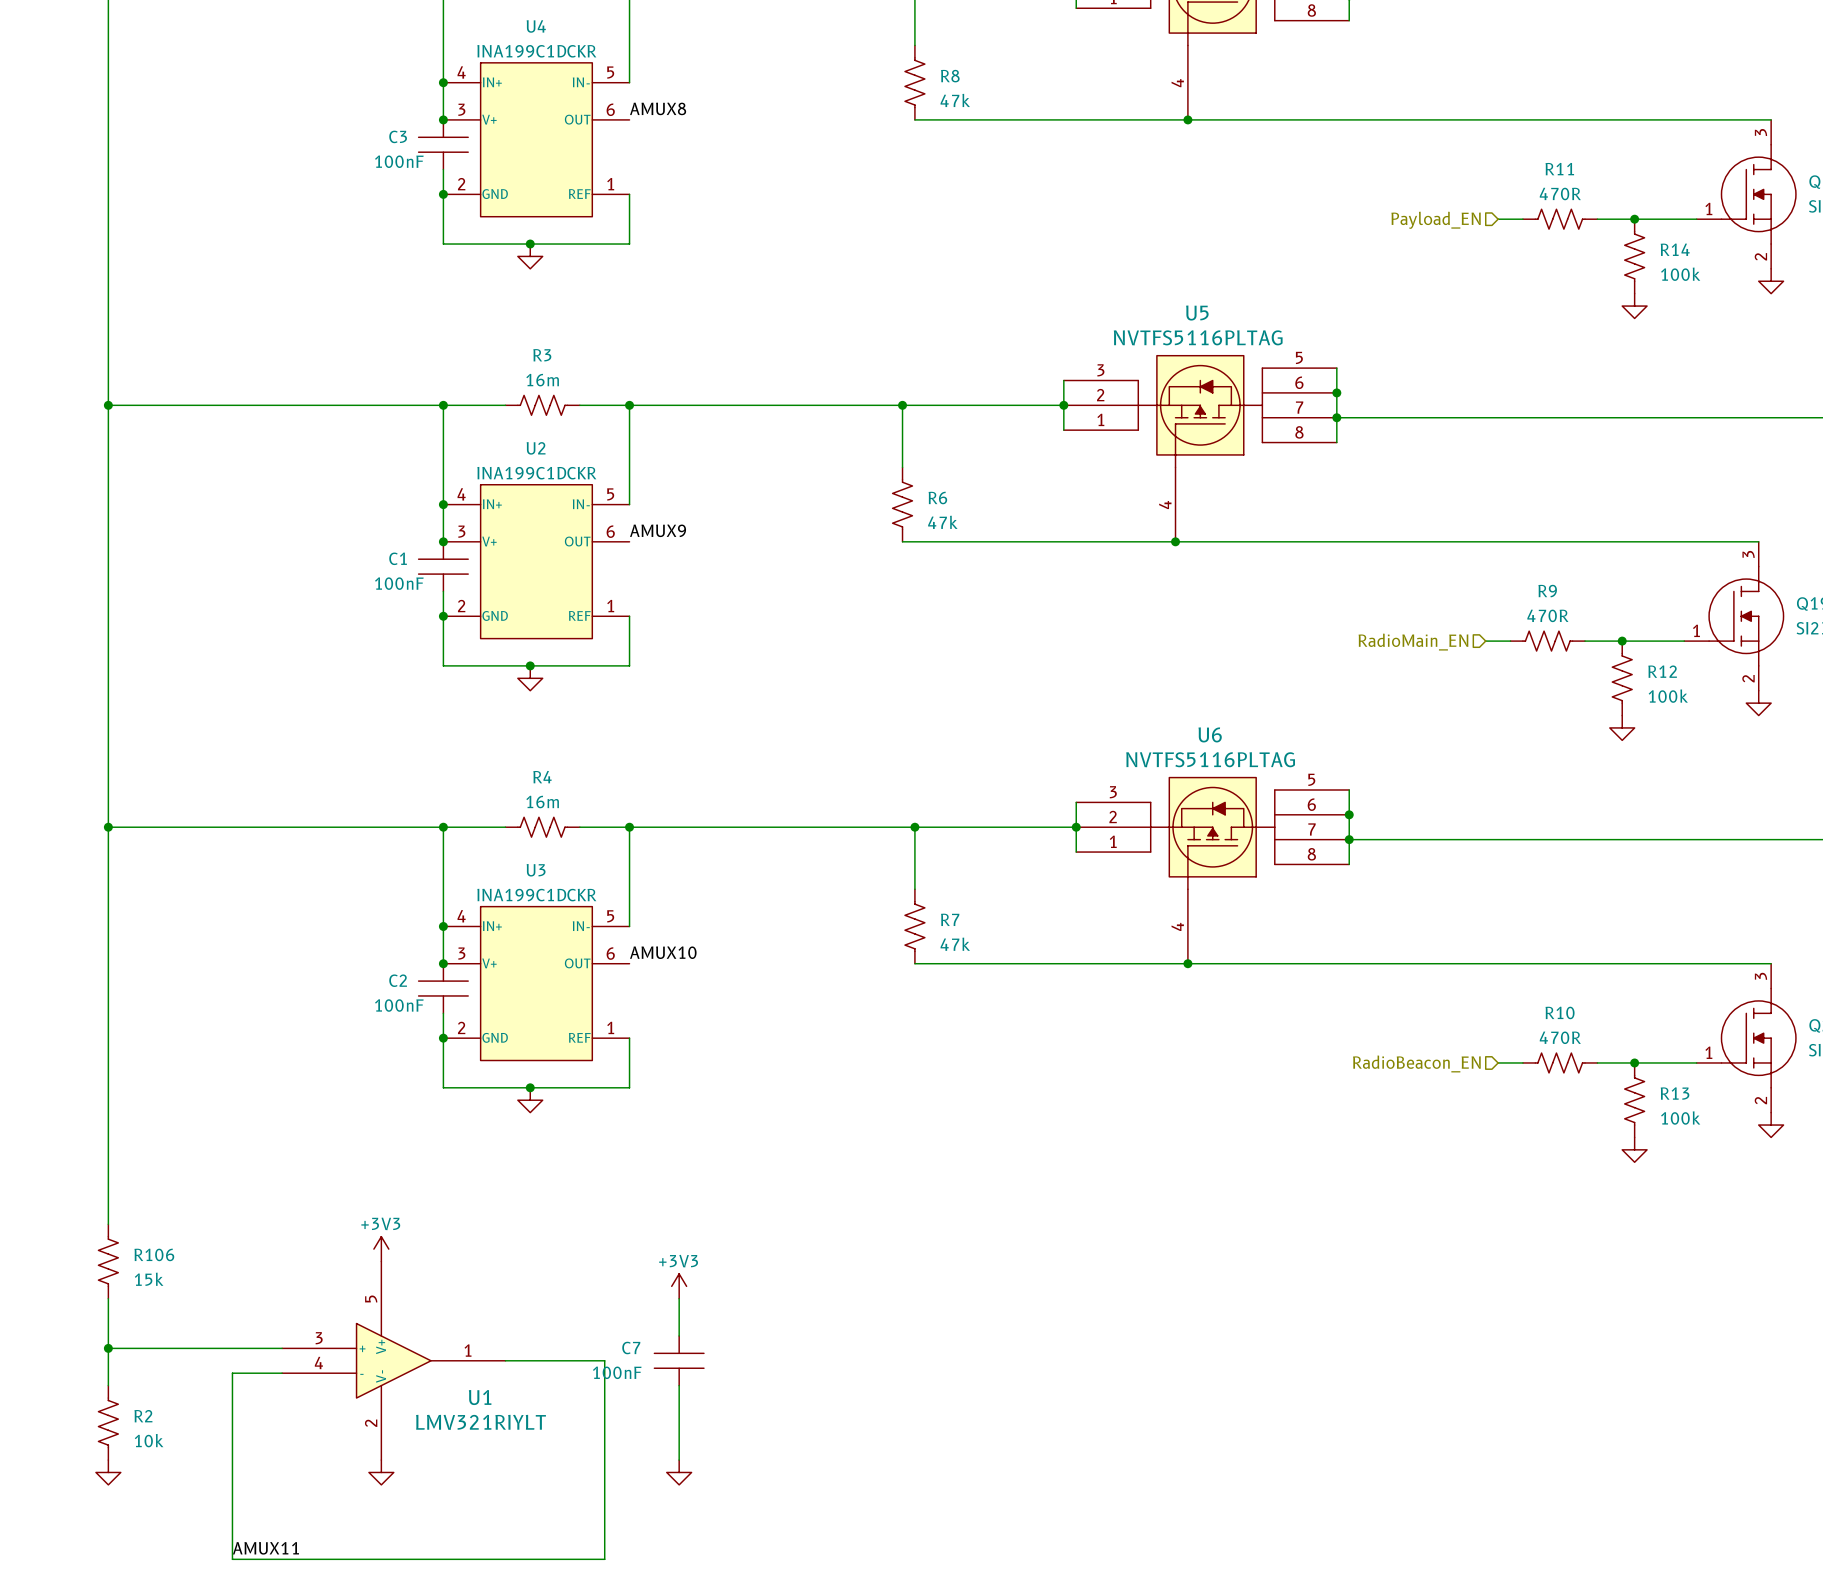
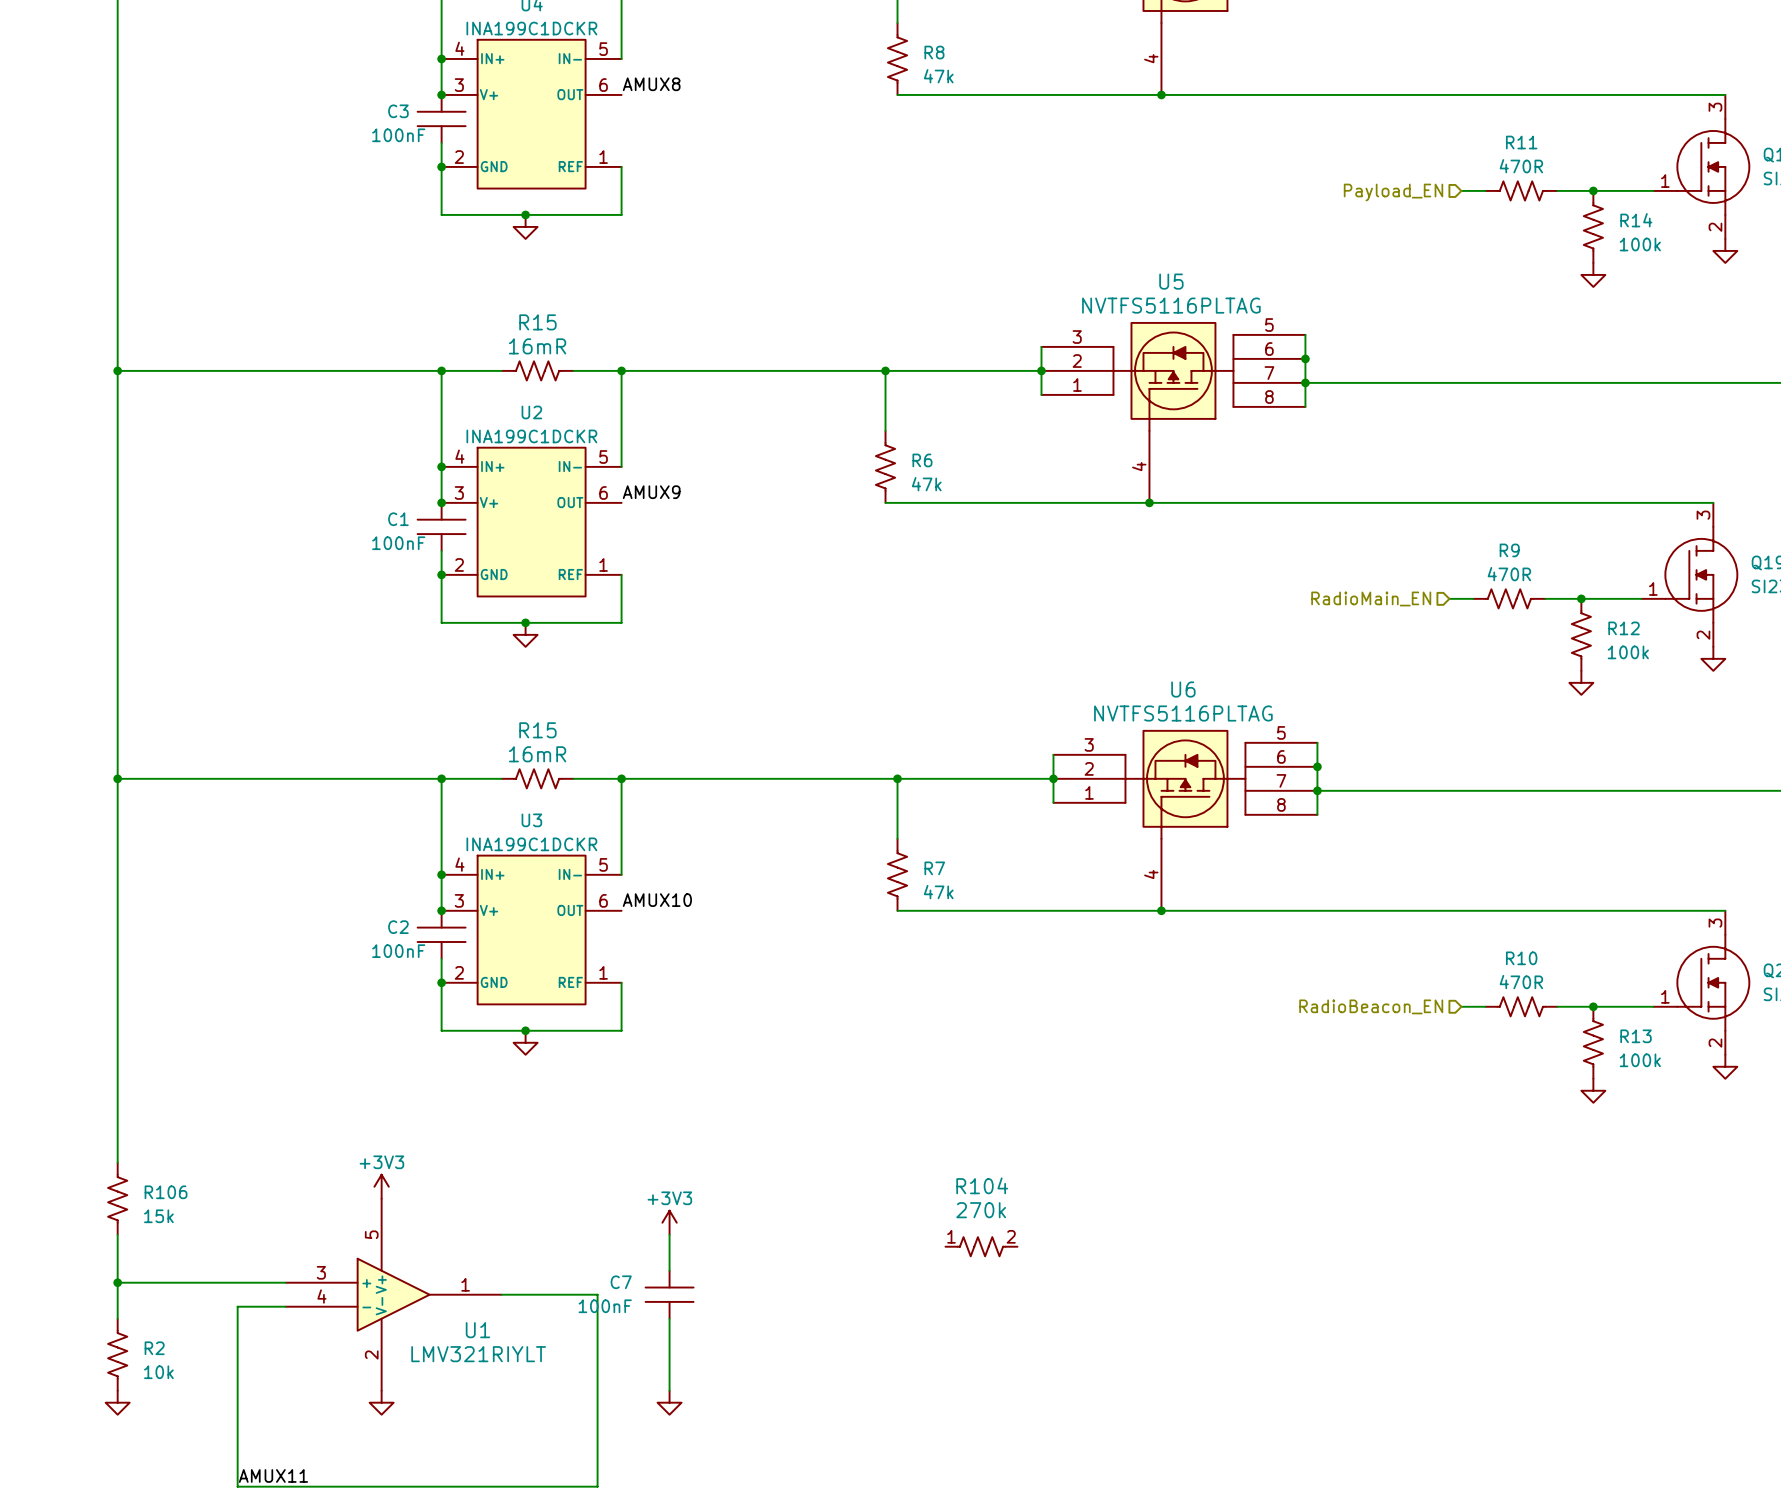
R3 name: R3 (542, 355) -> R15 (537, 322)
R3 value: 16m (542, 380) -> 16mR (537, 346)
R4 name: R4 (542, 777) -> R15 (537, 730)
R4 value: 16m (542, 802) -> 16mR (537, 754)
R104: none -> 270k (981, 1246)

